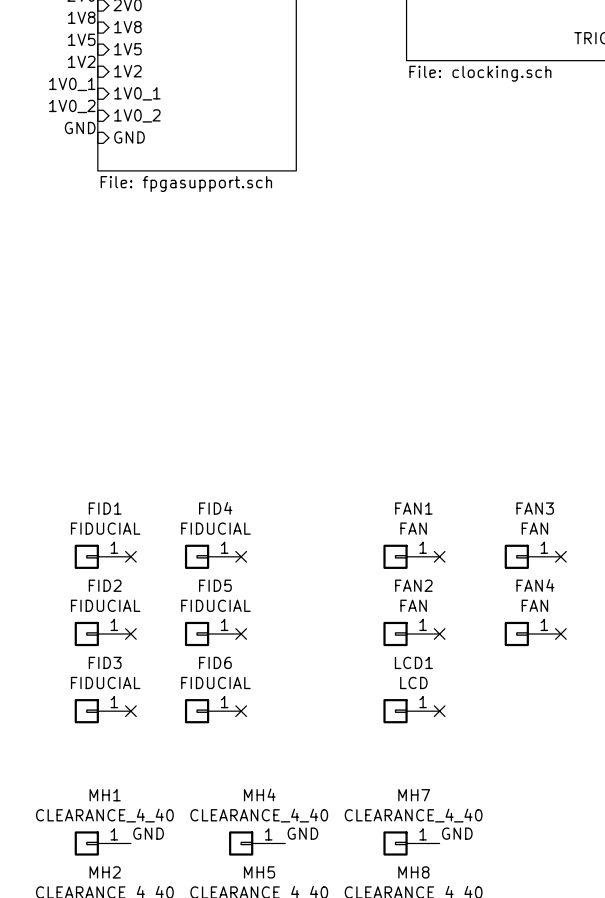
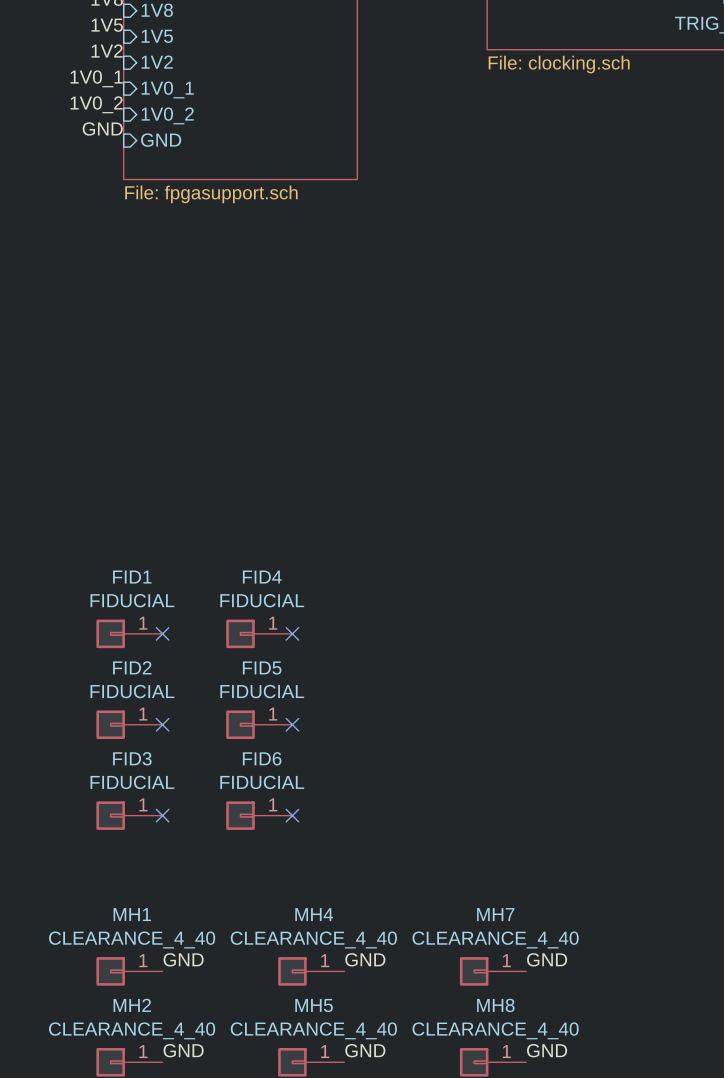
FAN1: FAN (411, 556) -> none
no-connect mark: (439, 556) -> none
FAN3: FAN (532, 556) -> none
no-connect mark: (560, 556) -> none
FAN2: FAN (411, 633) -> none
no-connect mark: (439, 633) -> none
FAN4: FAN (532, 633) -> none
no-connect mark: (560, 633) -> none
LCD1: LCD (411, 711) -> none
no-connect mark: (439, 711) -> none

